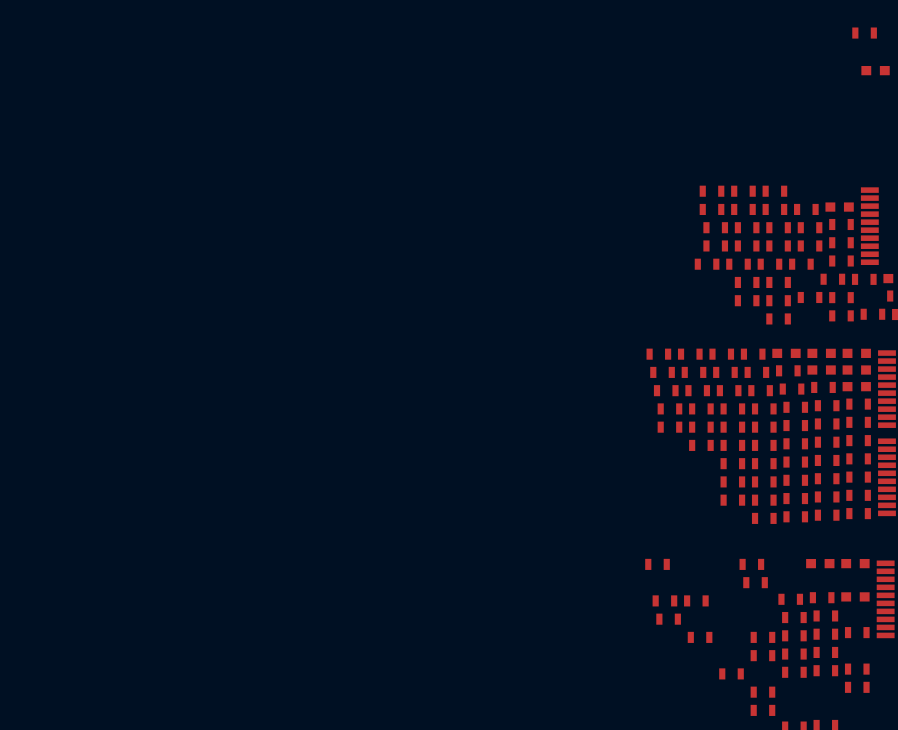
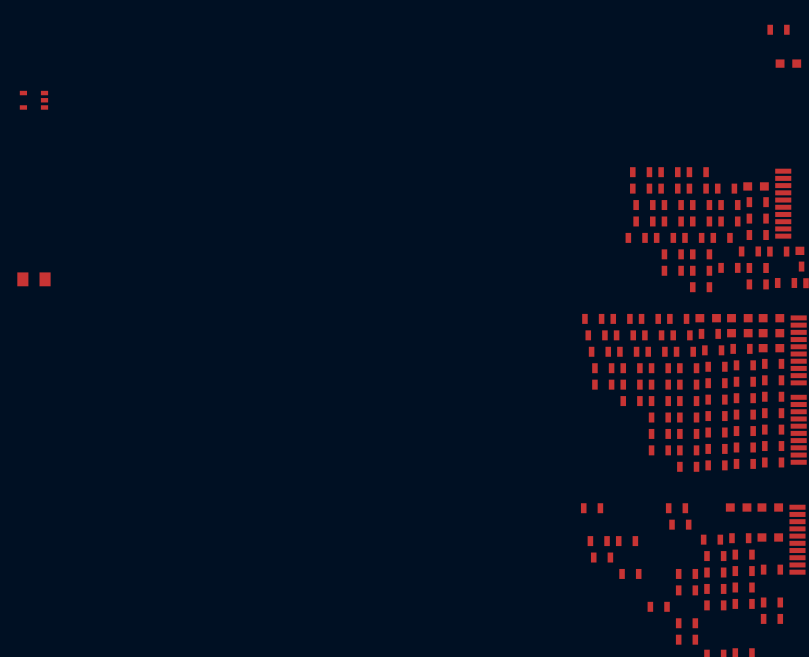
part: none -> (33, 100)
part: none -> (33, 279)

